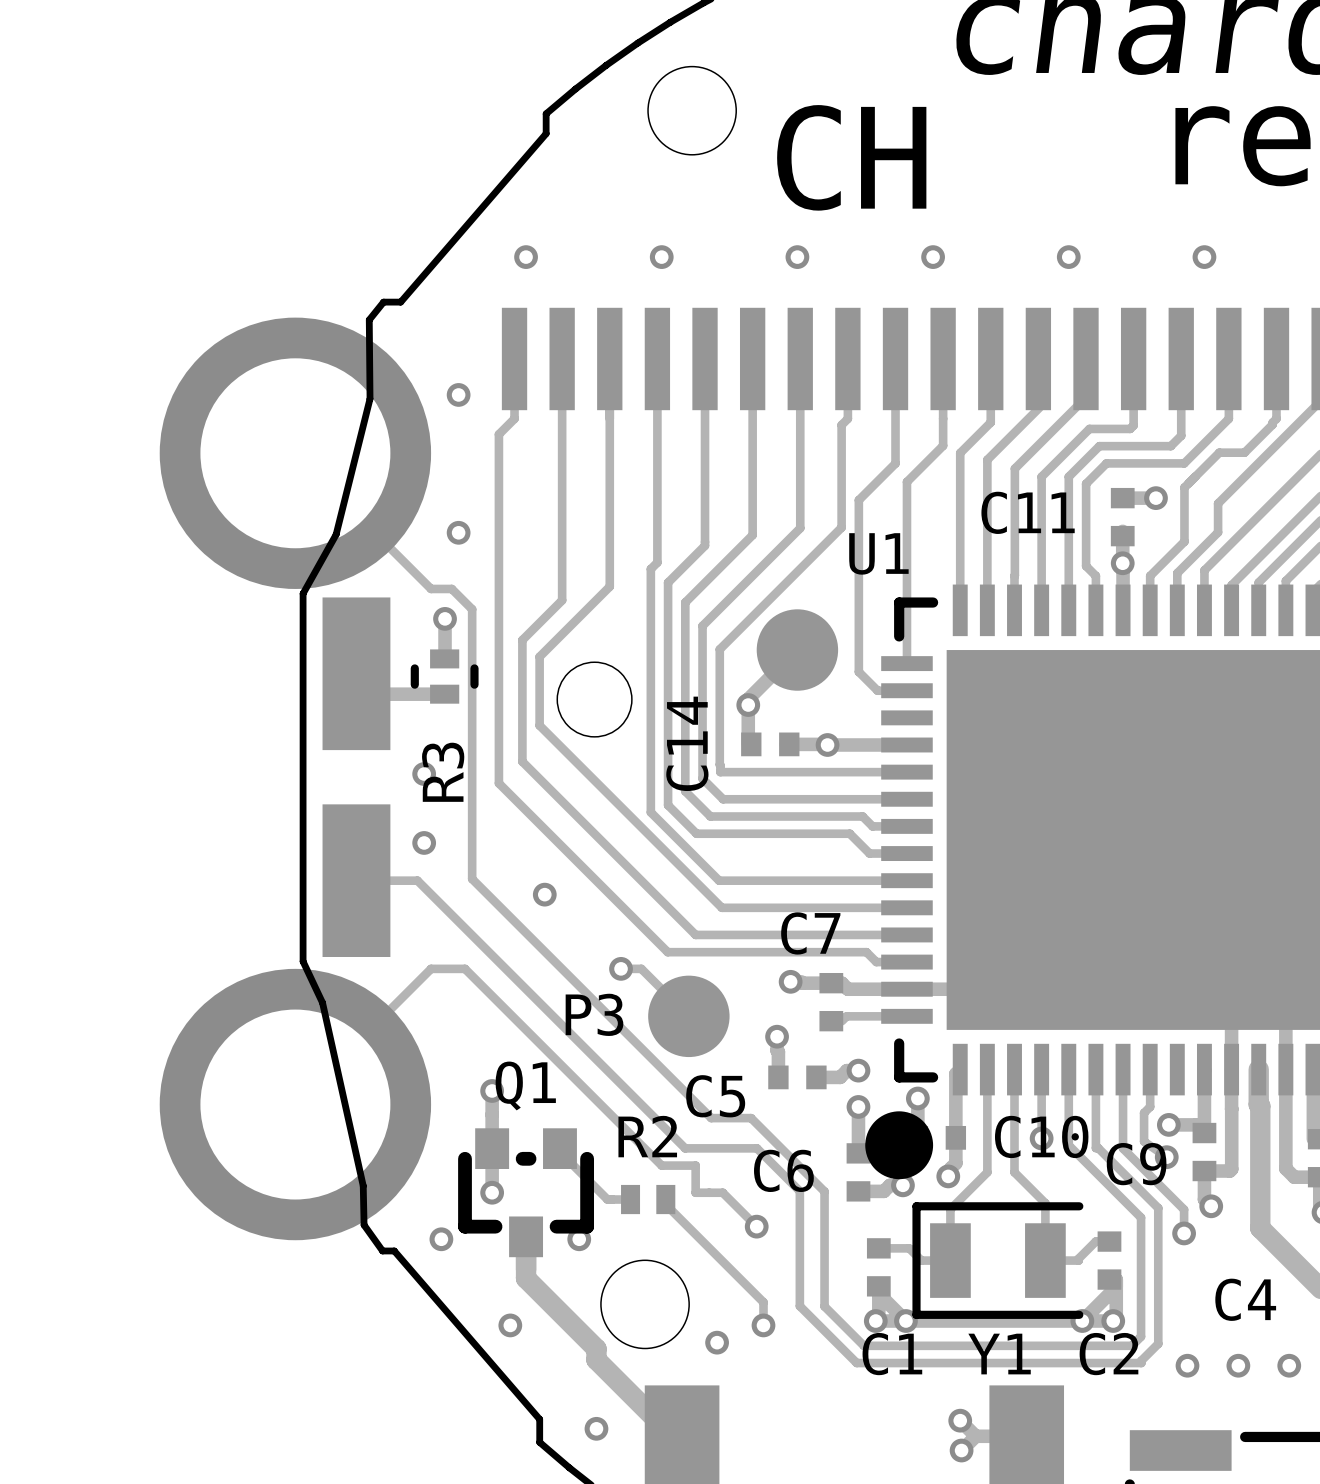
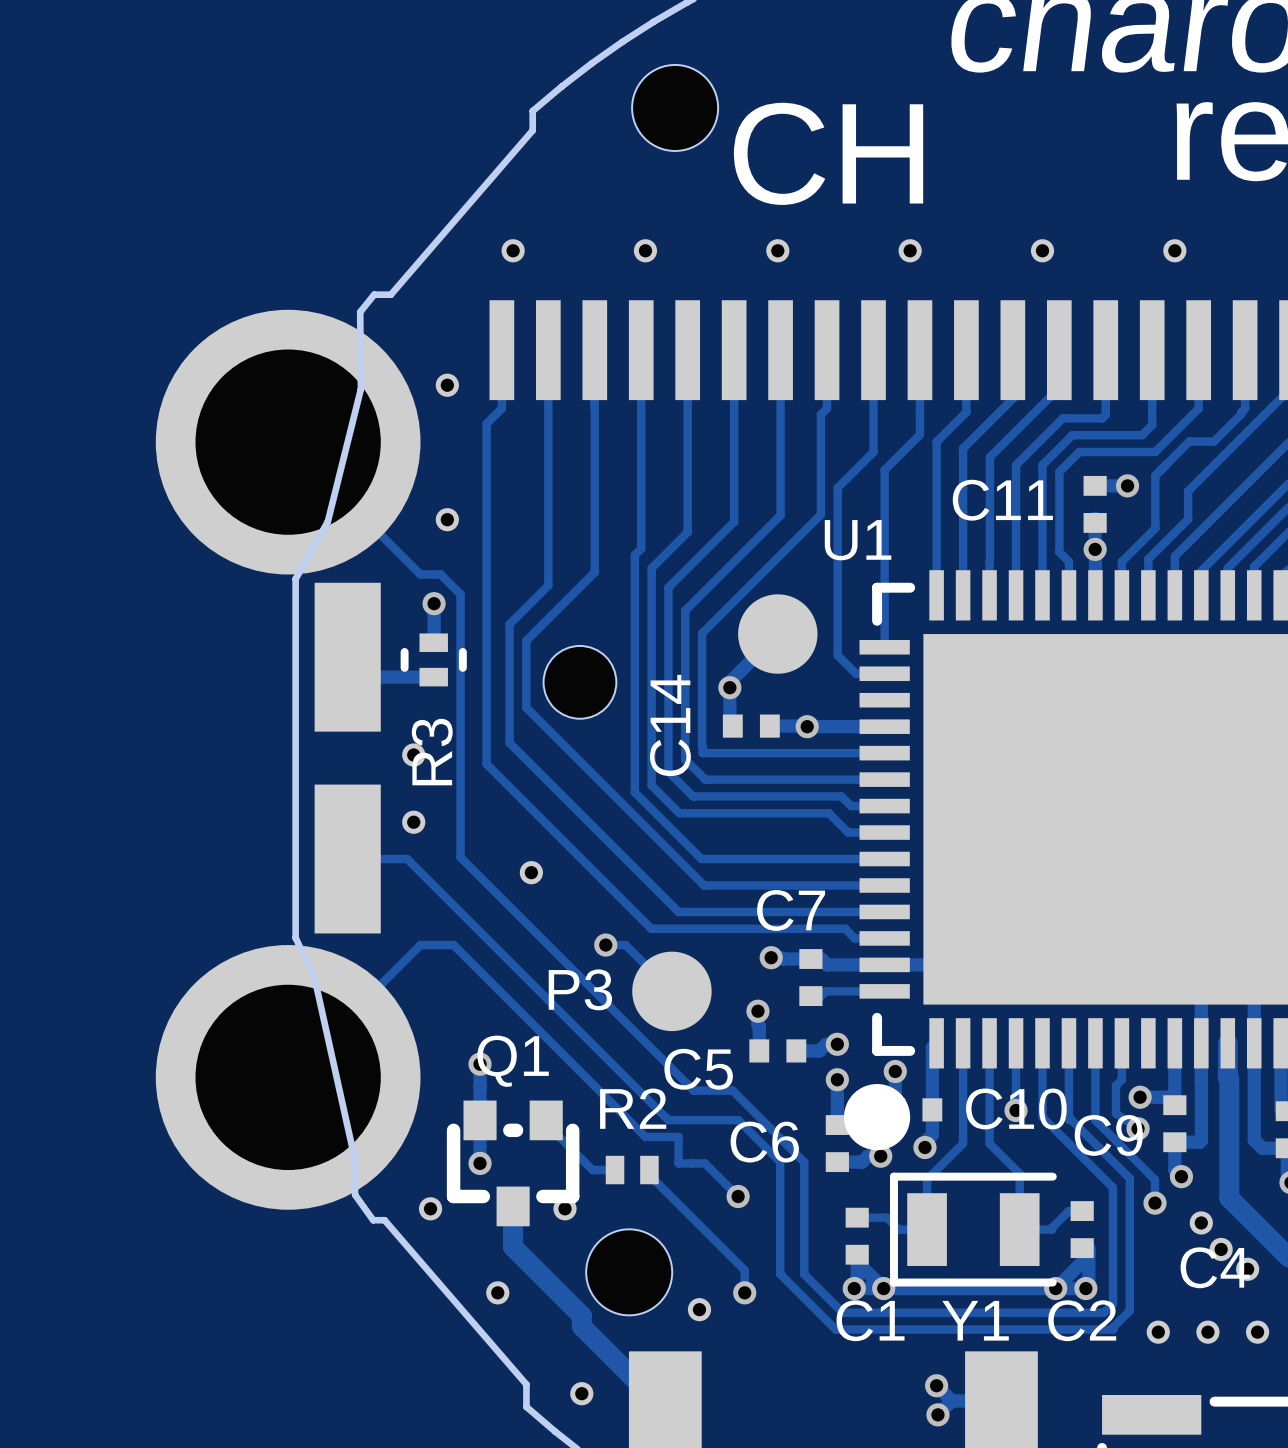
part: none -> (1201, 1222)
part: none -> (1221, 1249)
part: none -> (1247, 1269)

